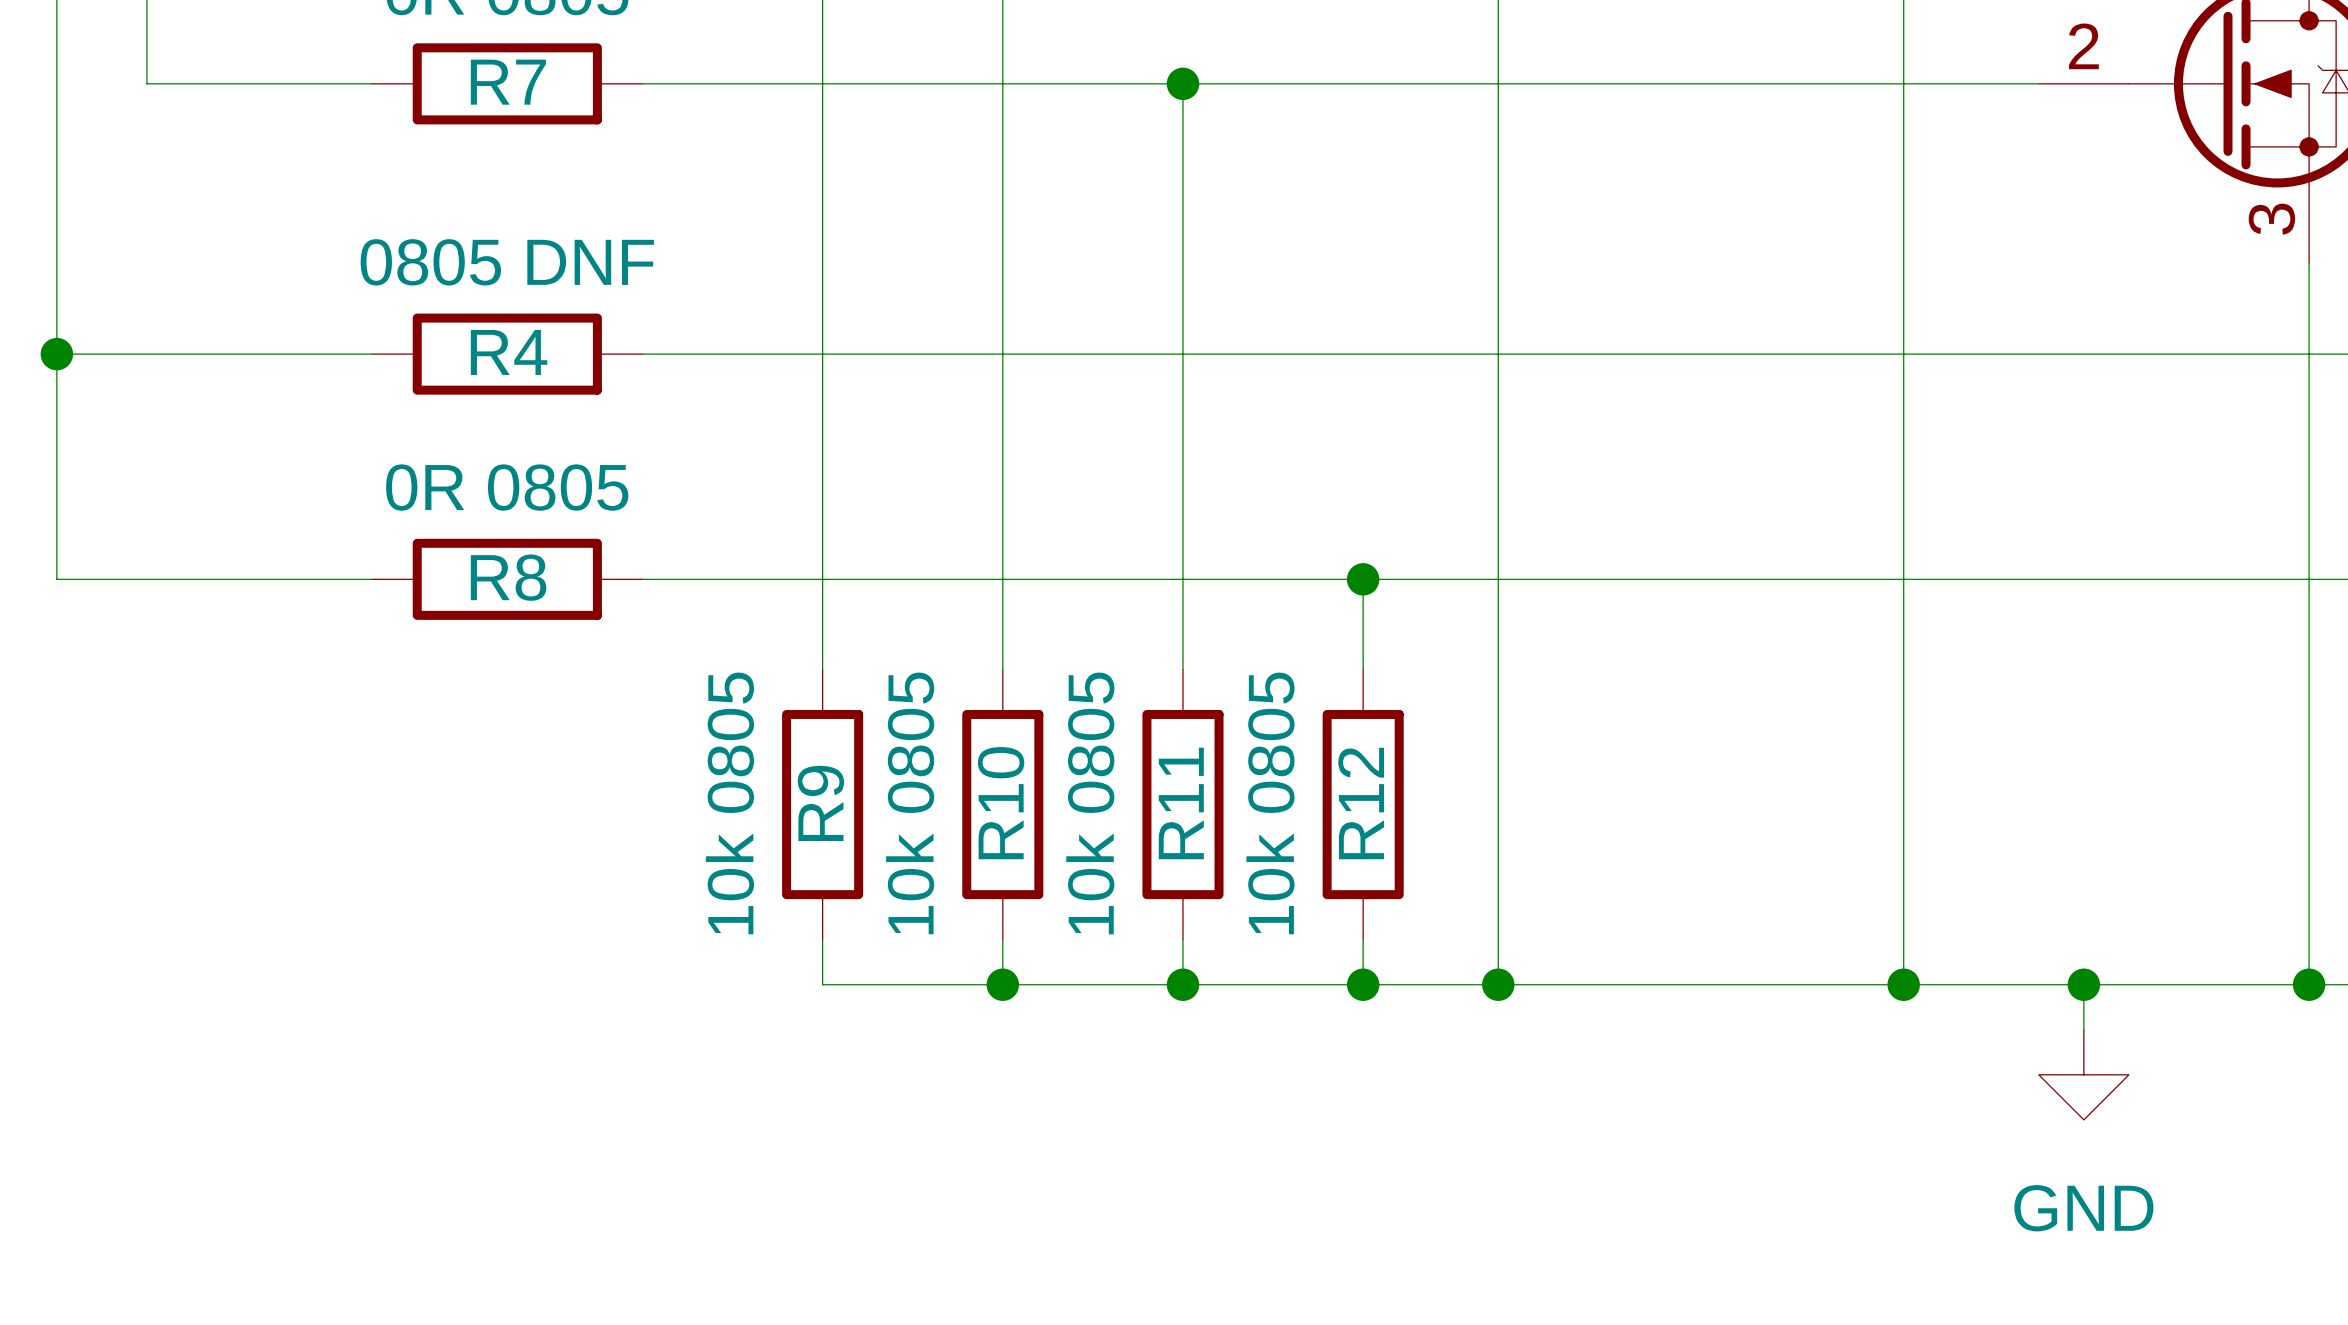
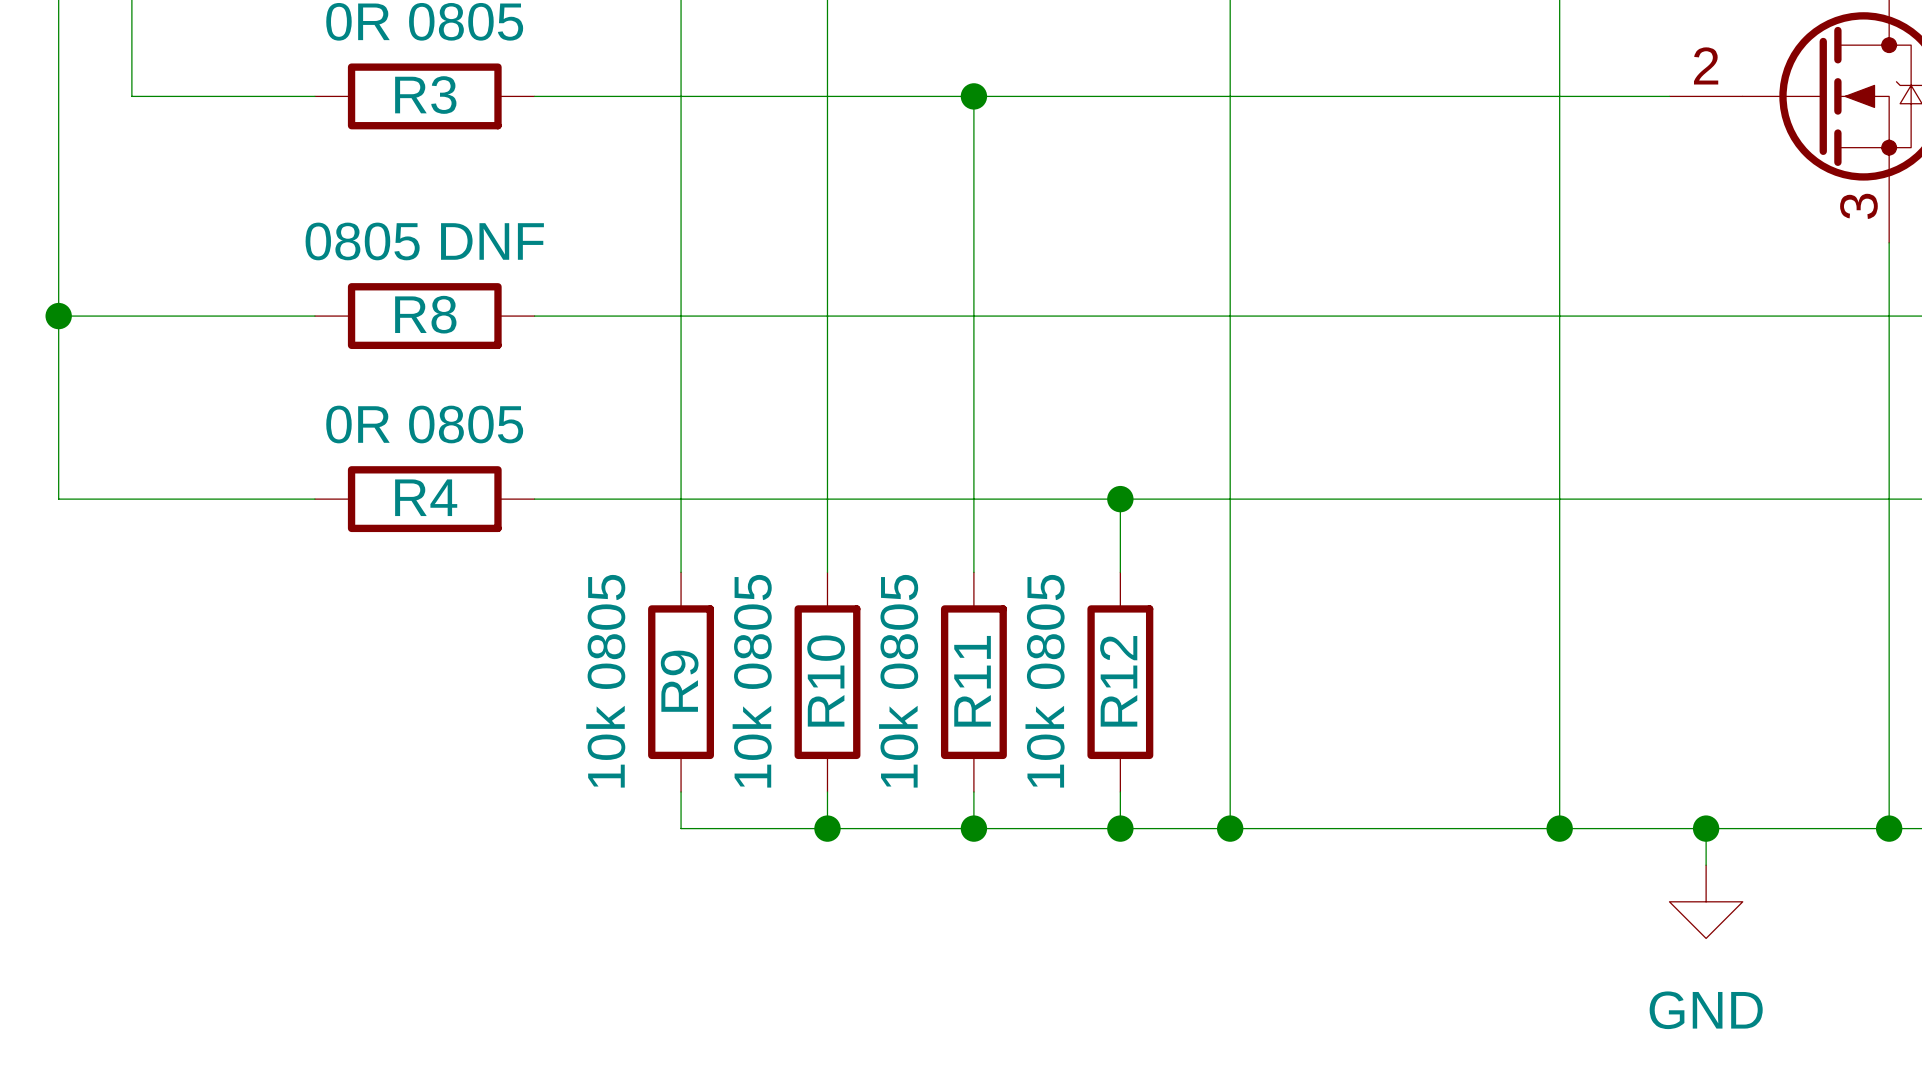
R7 name: R7 (508, 82) -> R3 (425, 95)
R4 name: R4 (509, 352) -> R8 (425, 314)
R8 name: R8 (508, 577) -> R4 (426, 497)

